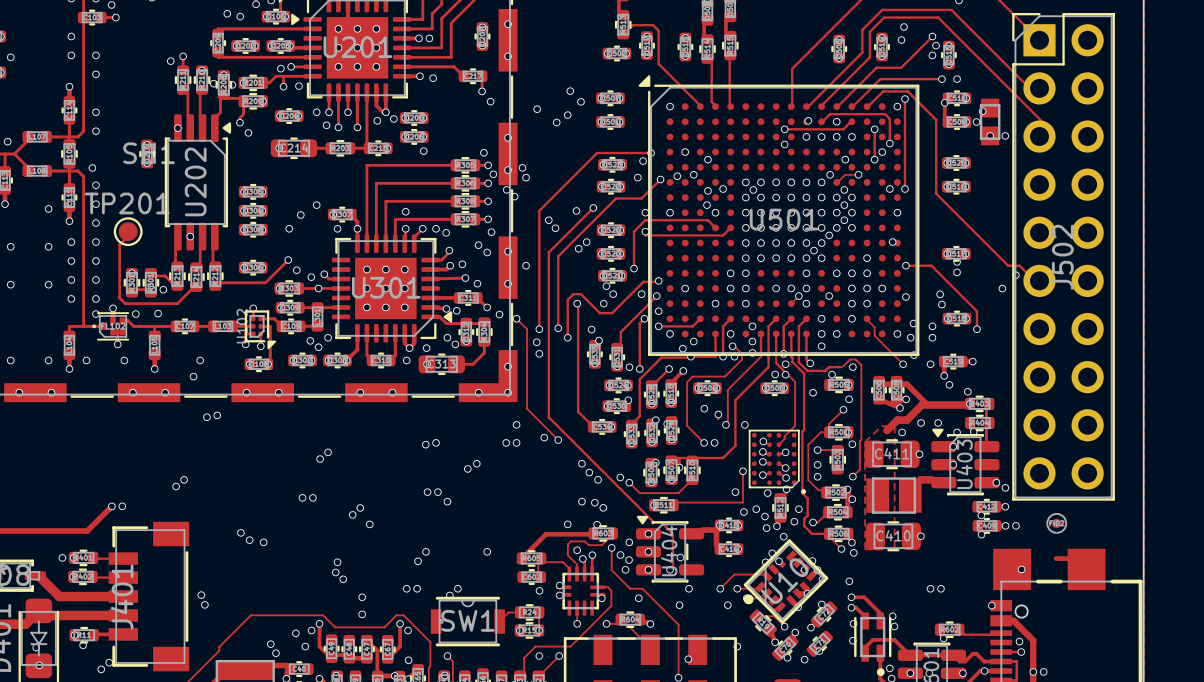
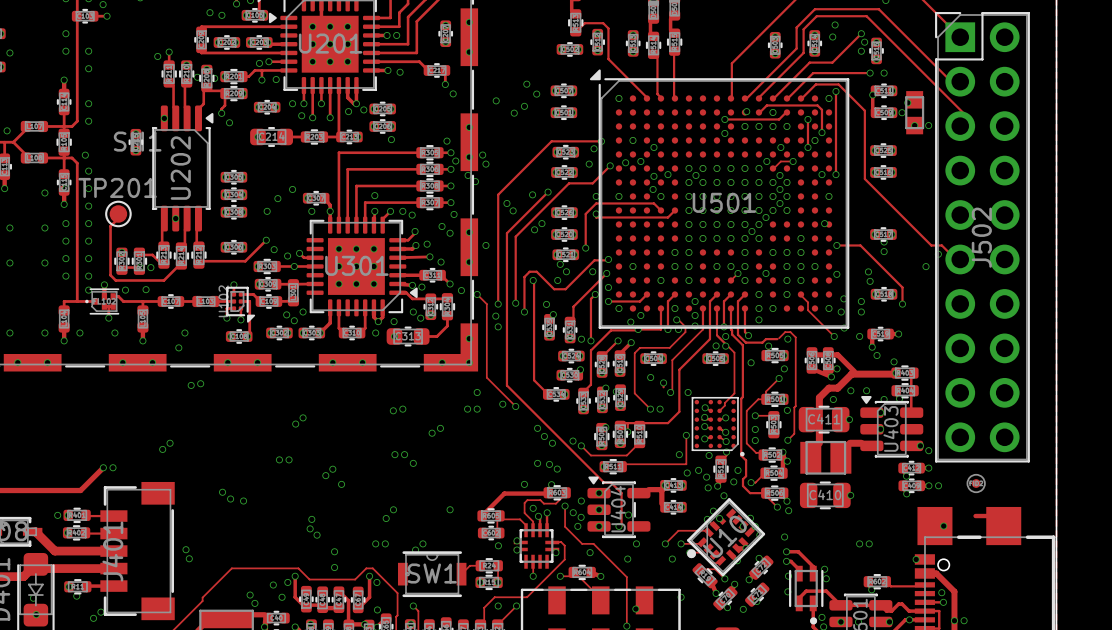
zone outline: (881, 426) (865, 441) (865, 549) (894, 549) (894, 426) (881, 426) -> none
track: none -> (819, 397) (819, 443)

